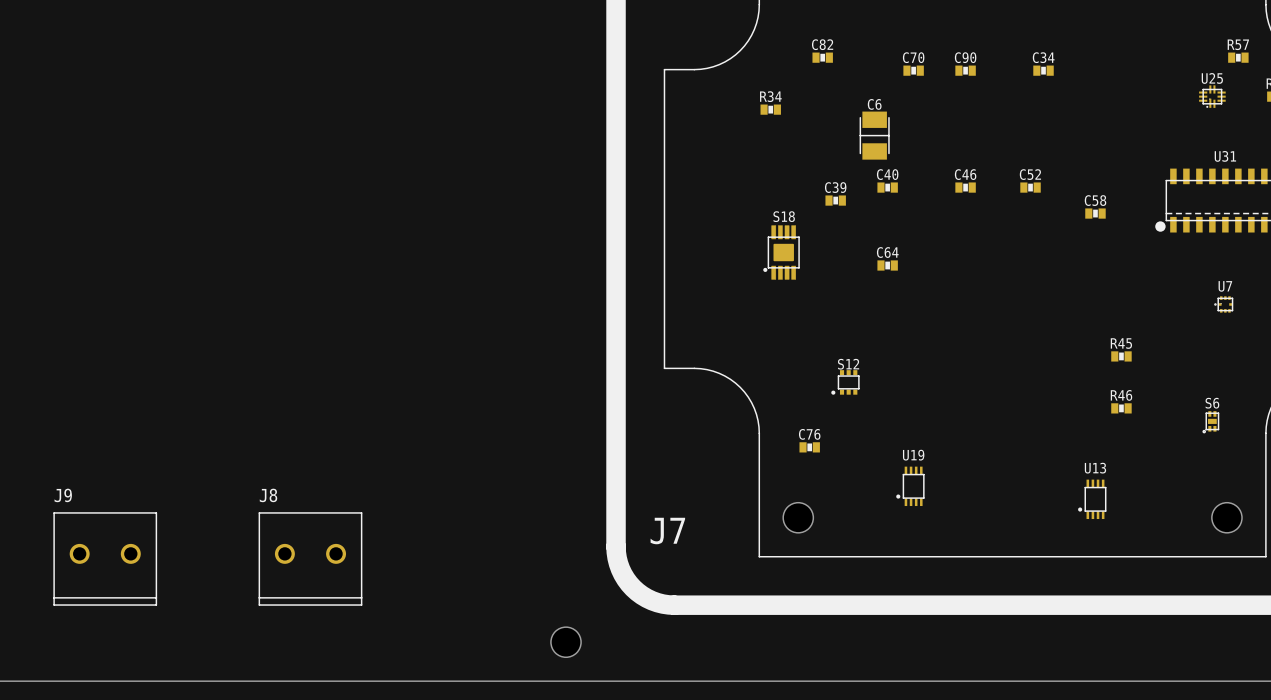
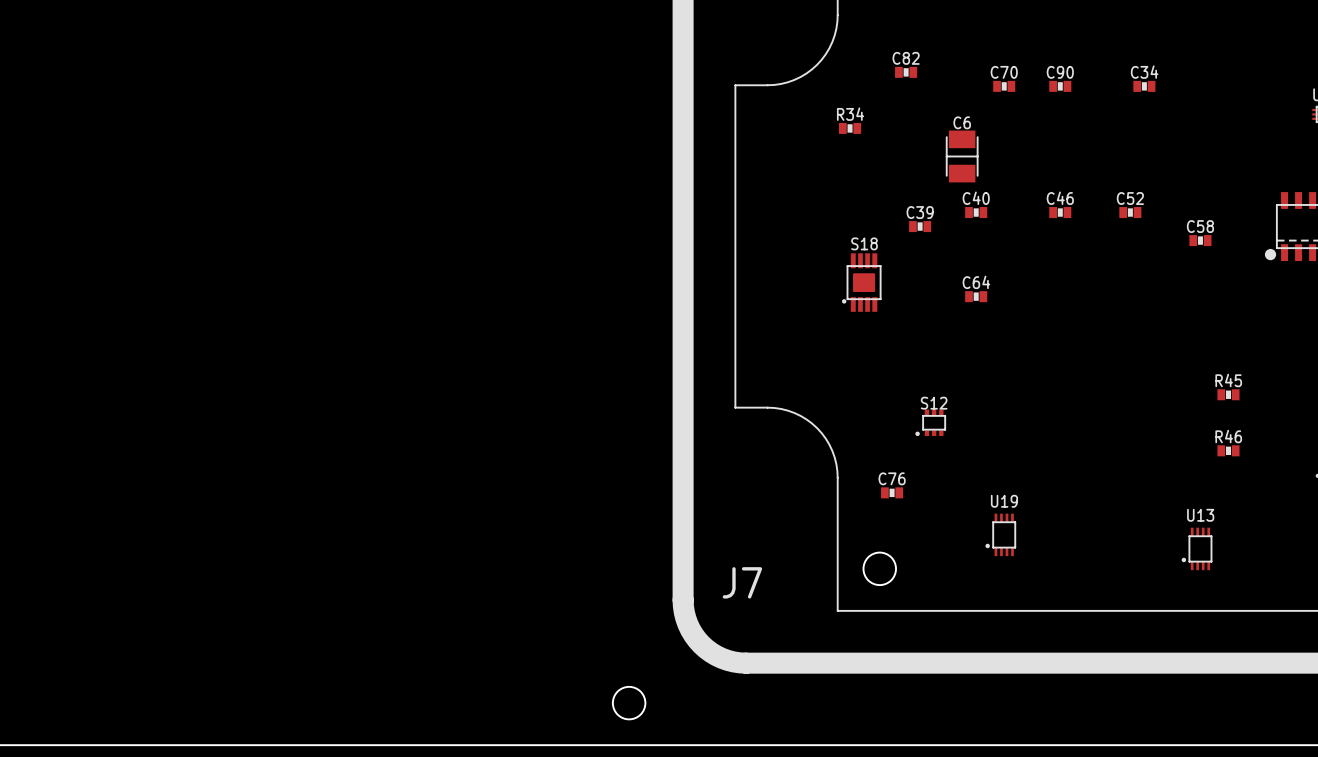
J9: (105, 558) -> none
J8: (310, 558) -> none

